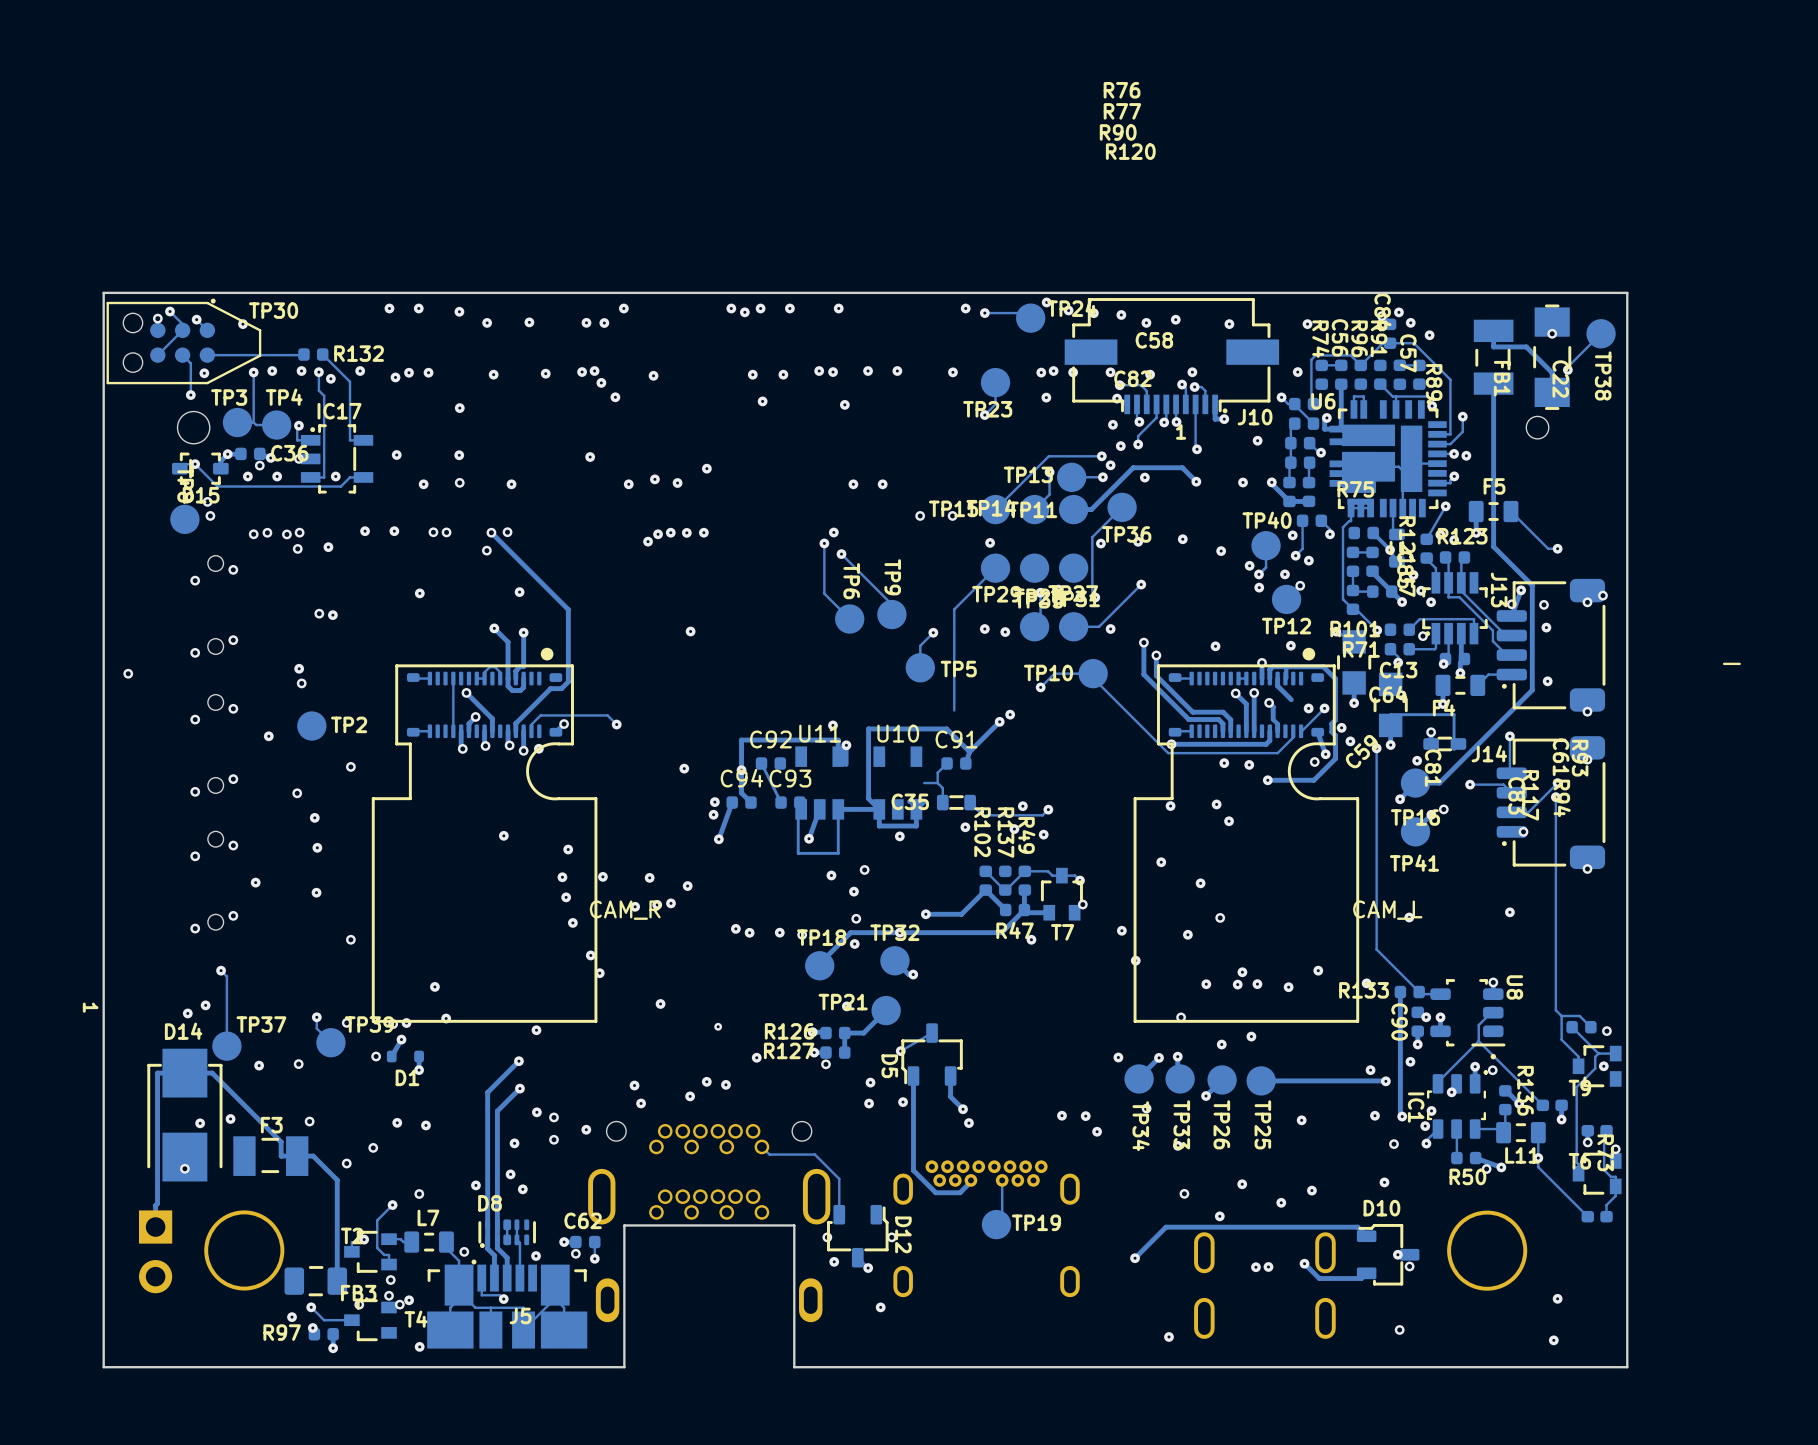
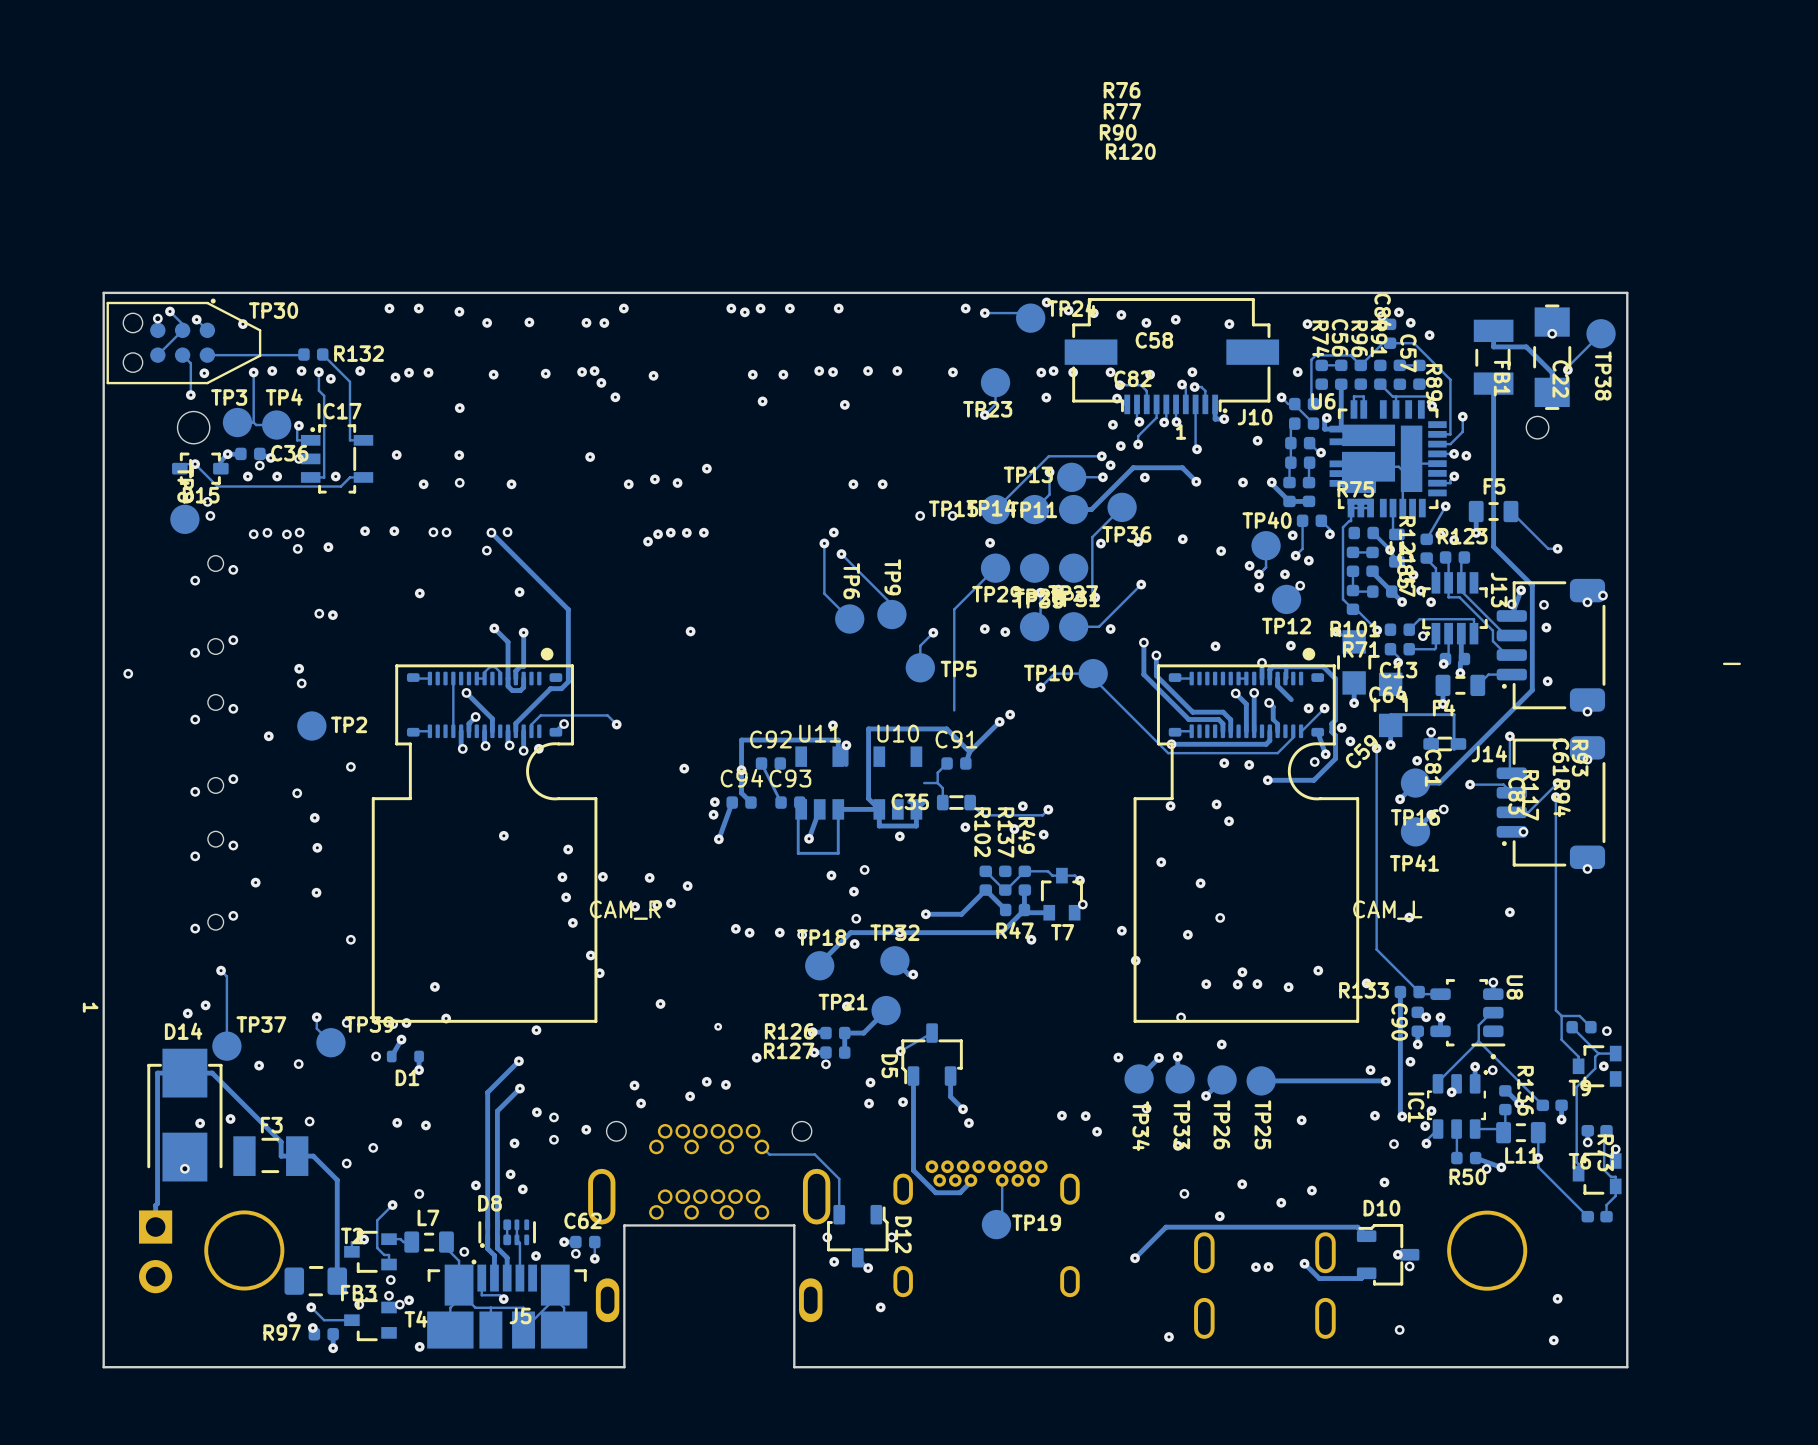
via: (1251, 1036) -> none

